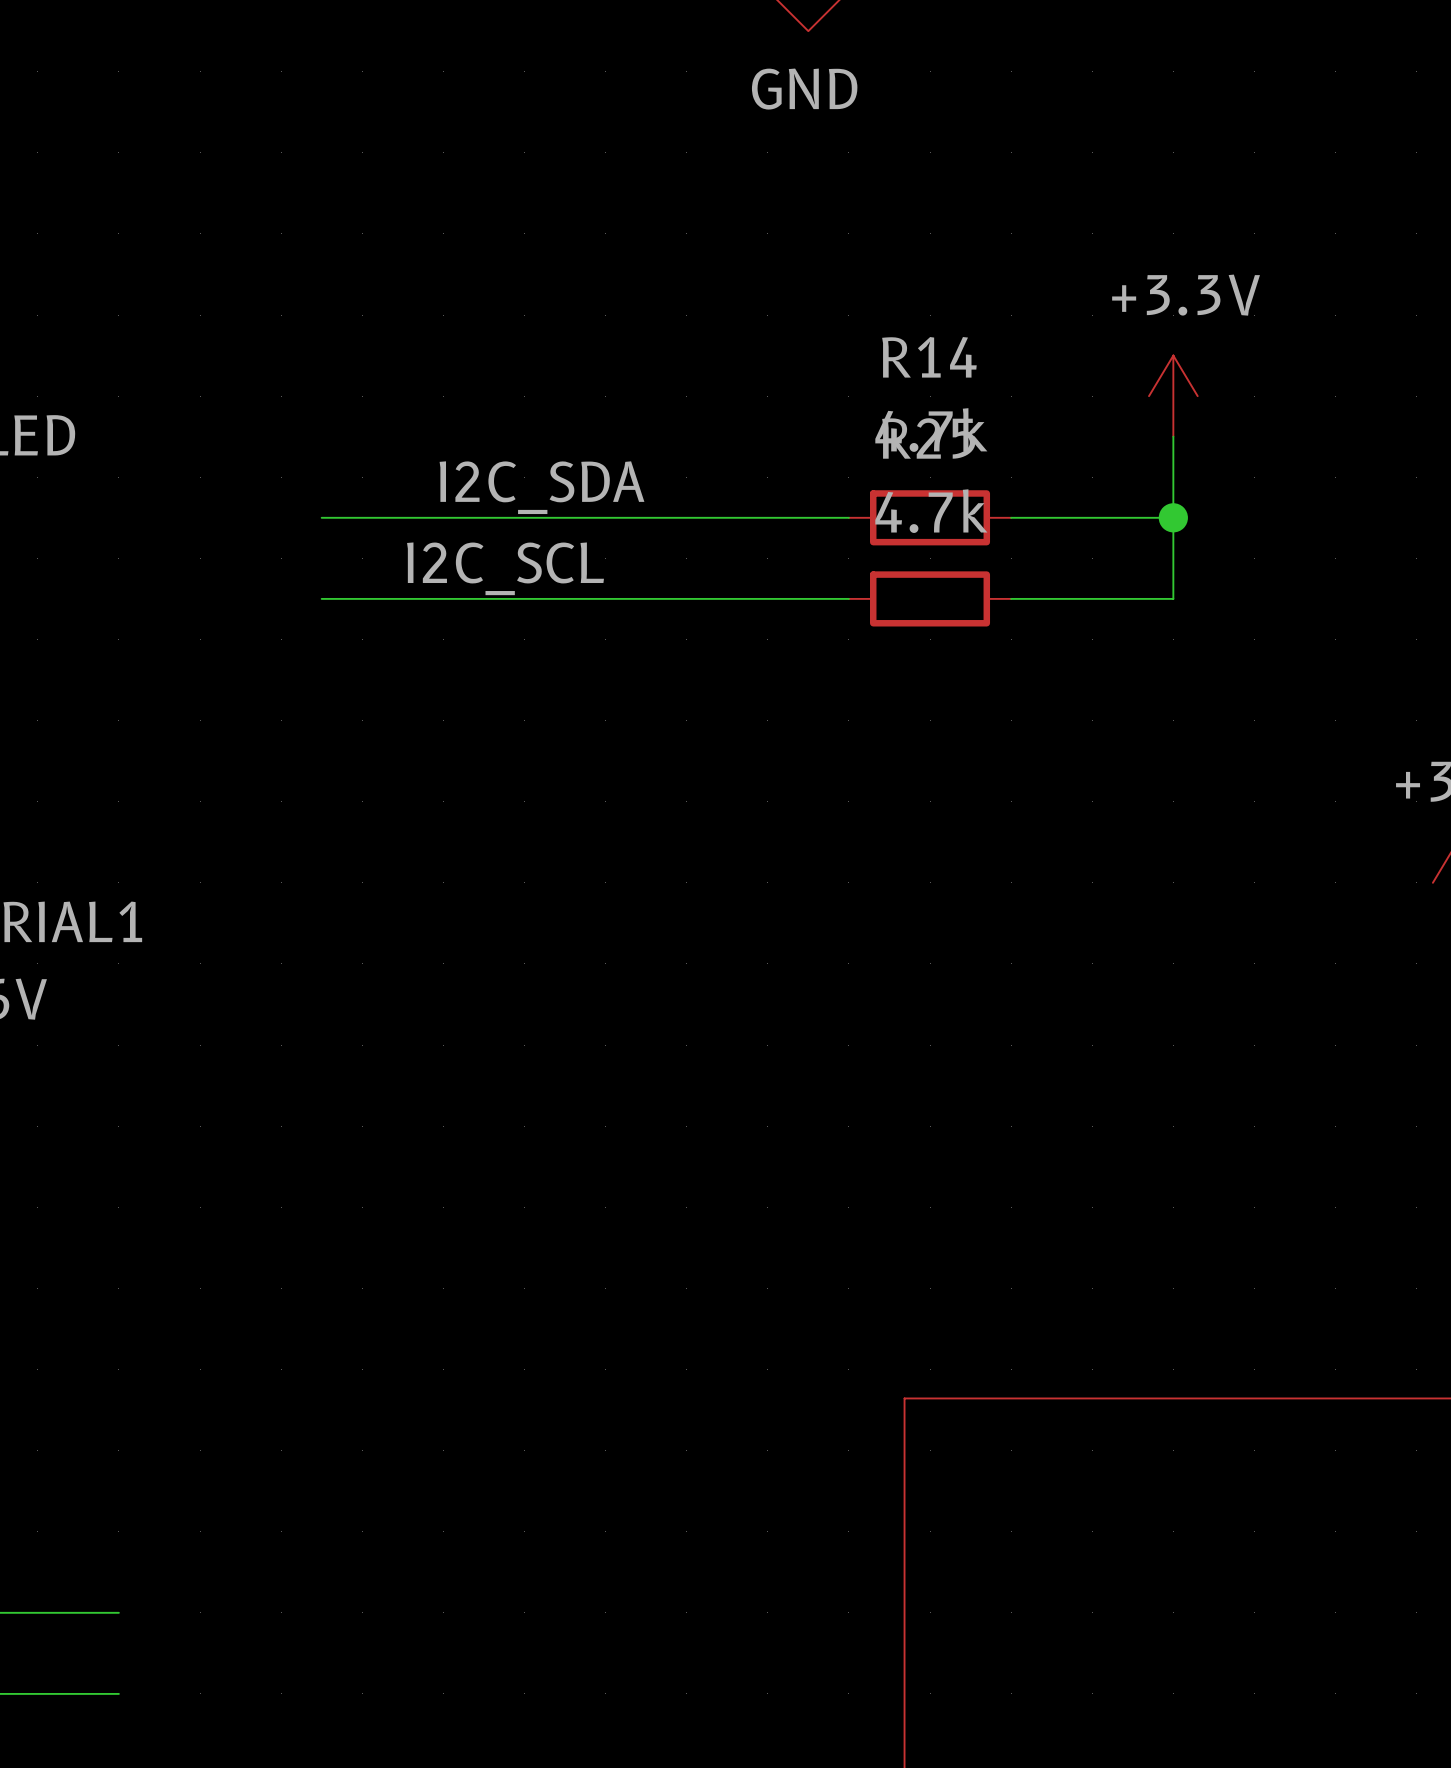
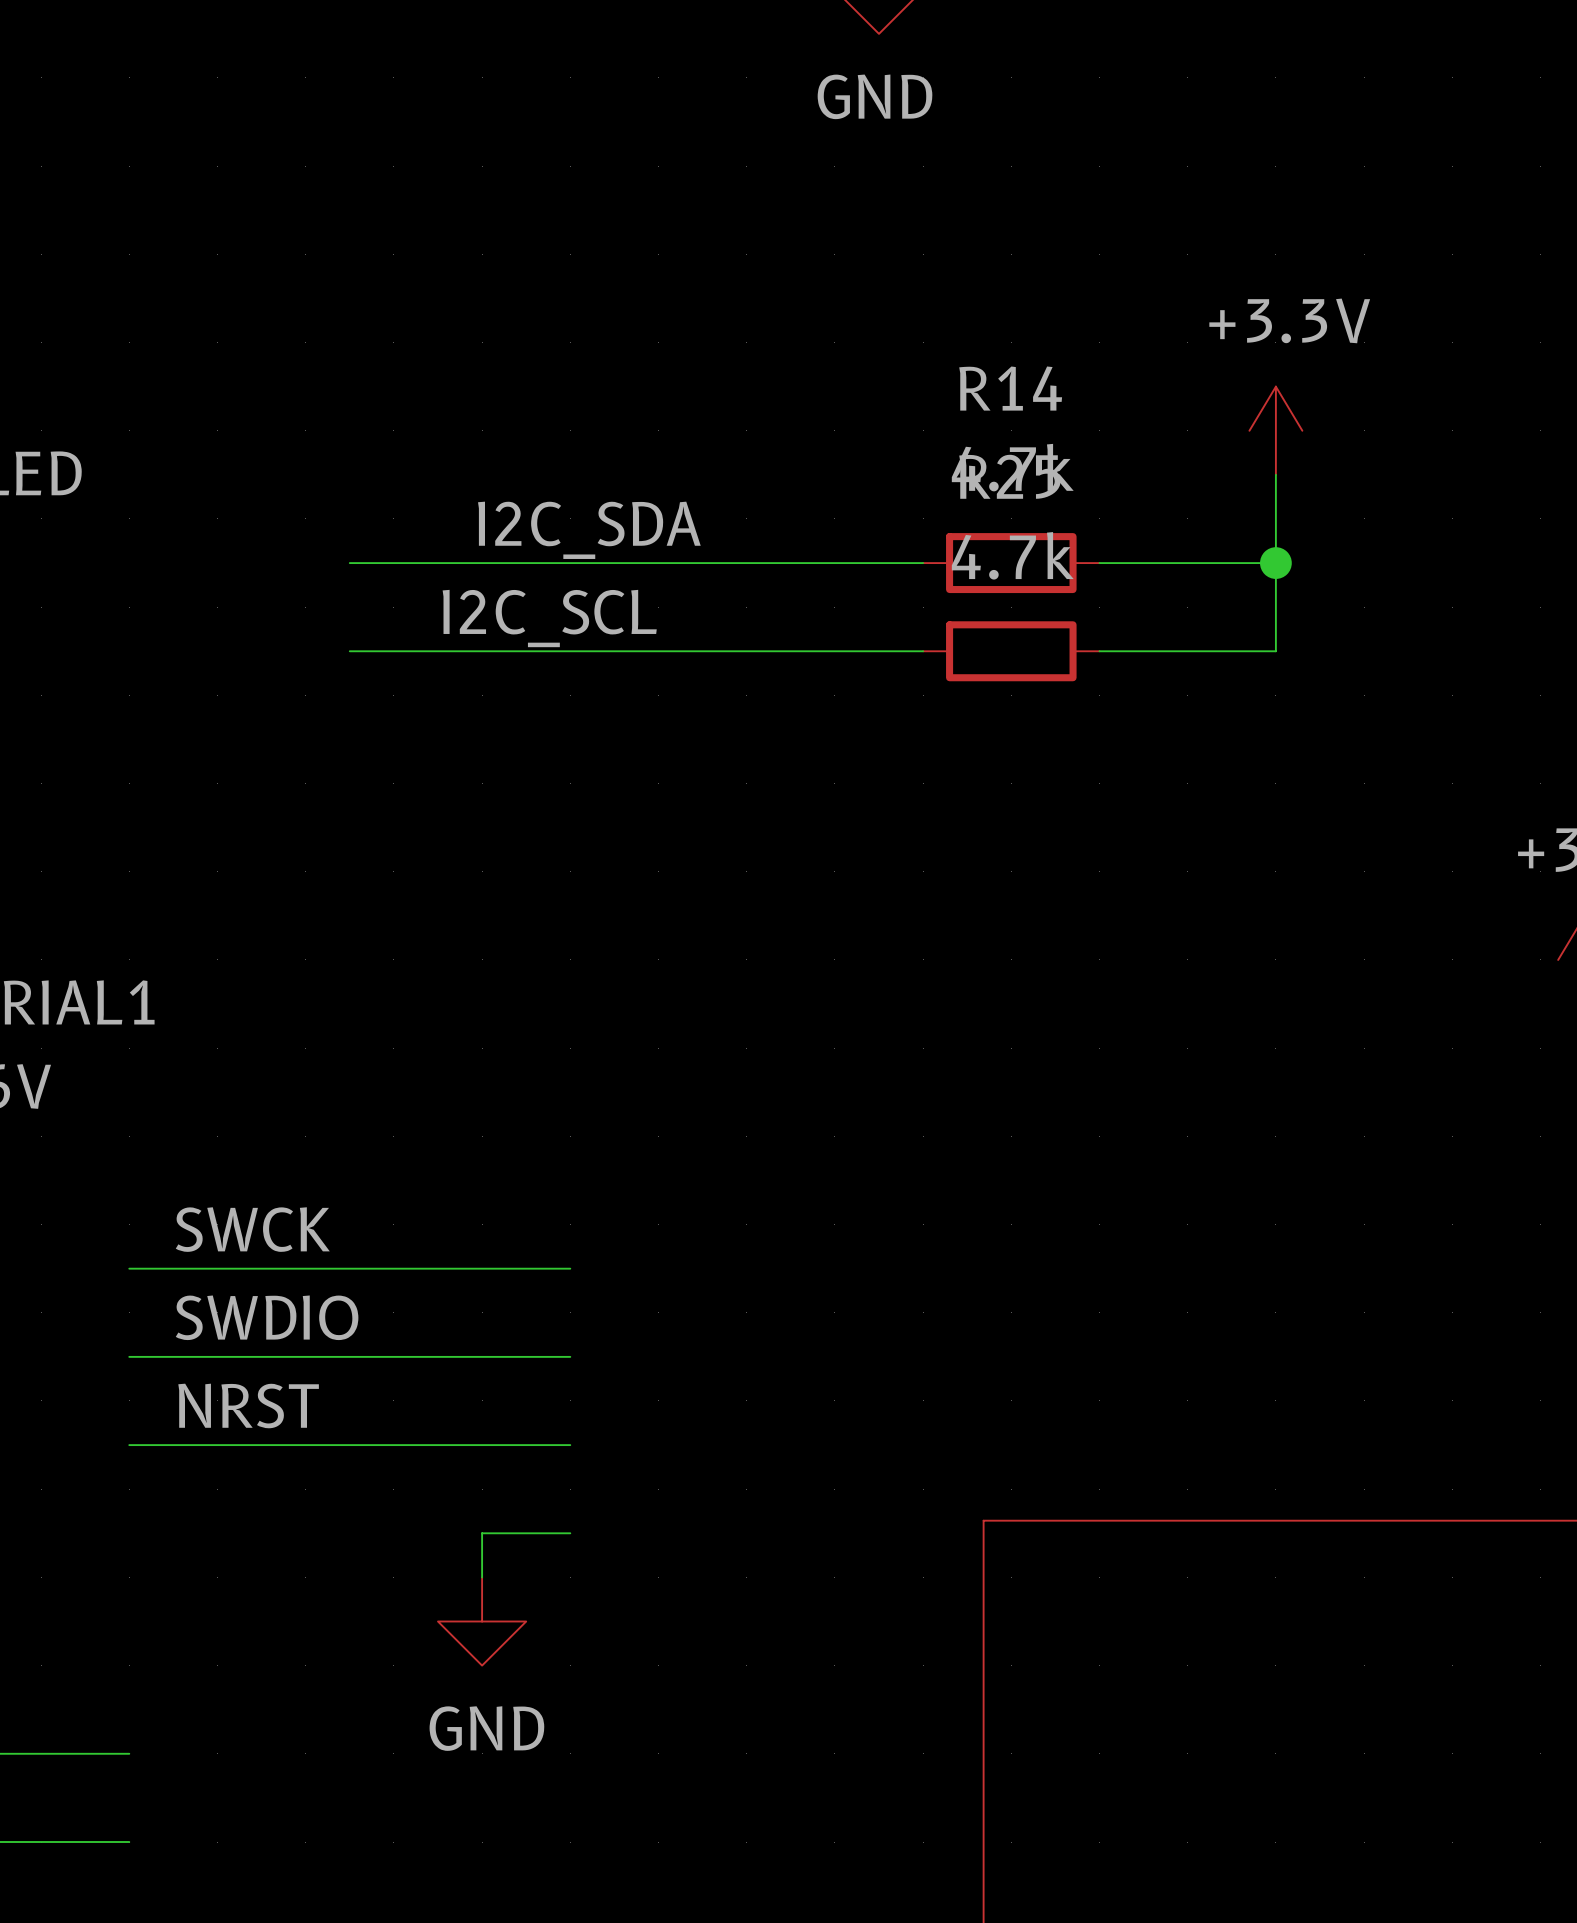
label: none -> SWCK (252, 1229)
wire: none -> (129, 1268) (570, 1268)
label: none -> SWDIO (267, 1317)
wire: none -> (129, 1356) (570, 1356)
label: none -> NRST (248, 1405)
wire: none -> (129, 1445) (570, 1445)
wire: none -> (570, 1533) (482, 1533) (482, 1577)
power symbol: none -> GND (482, 1621)

